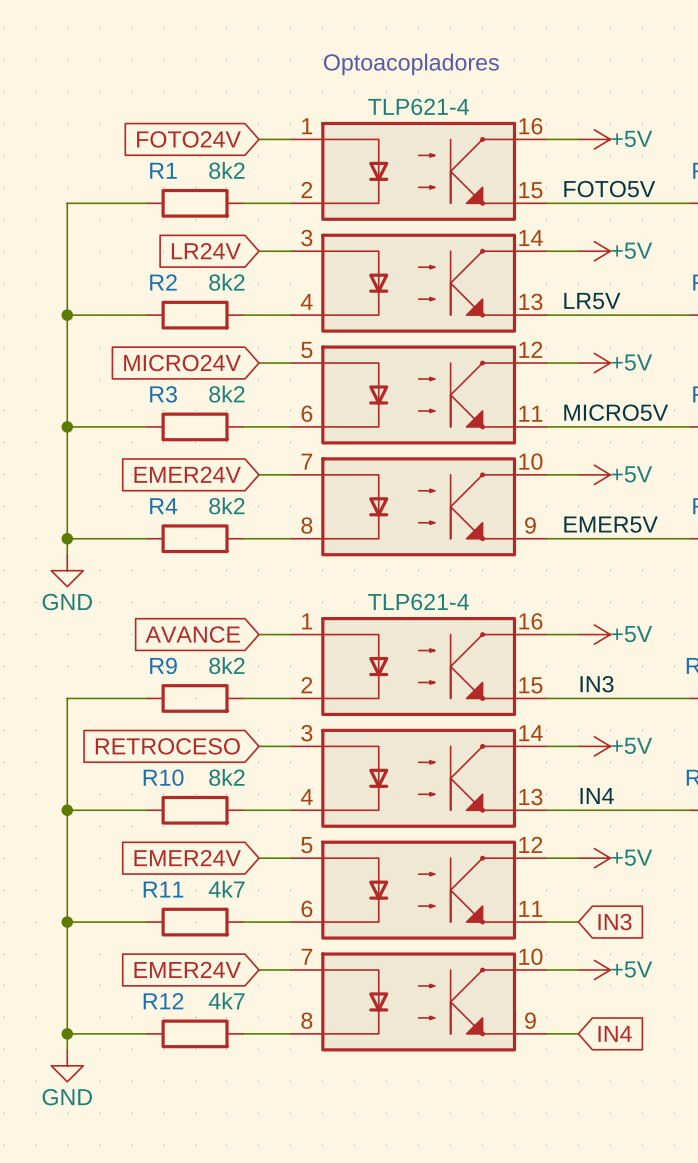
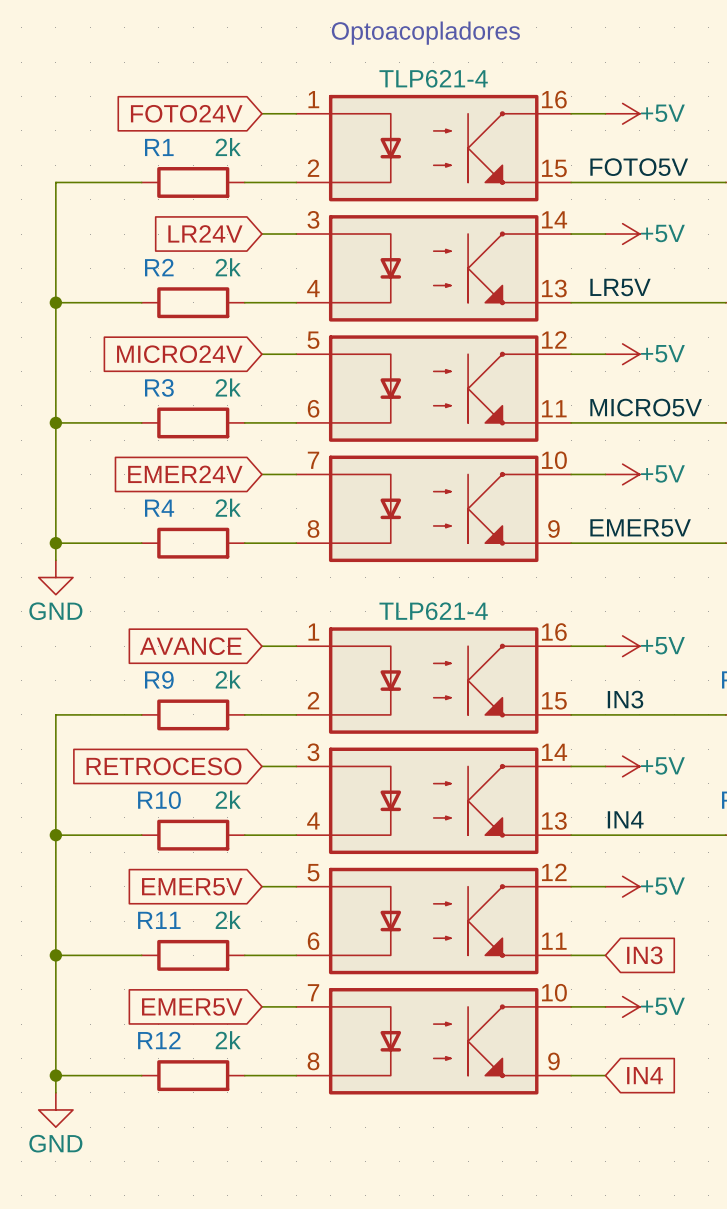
R1 value: 8k2 (226, 170) -> 2k (228, 147)
R2 value: 8k2 (226, 282) -> 2k (228, 267)
R3 value: 8k2 (226, 394) -> 2k (228, 387)
R4 value: 8k2 (226, 505) -> 2k (228, 507)
R9 value: 8k2 (226, 665) -> 2k (228, 679)
R10 value: 8k2 (226, 777) -> 2k (228, 799)
global label: EMER24V (187, 858) -> EMER5V (192, 886)
R11 value: 4k7 (226, 889) -> 2k (228, 919)
global label: EMER24V (187, 969) -> EMER5V (192, 1007)
R12 value: 4k7 (226, 1000) -> 2k (228, 1040)

